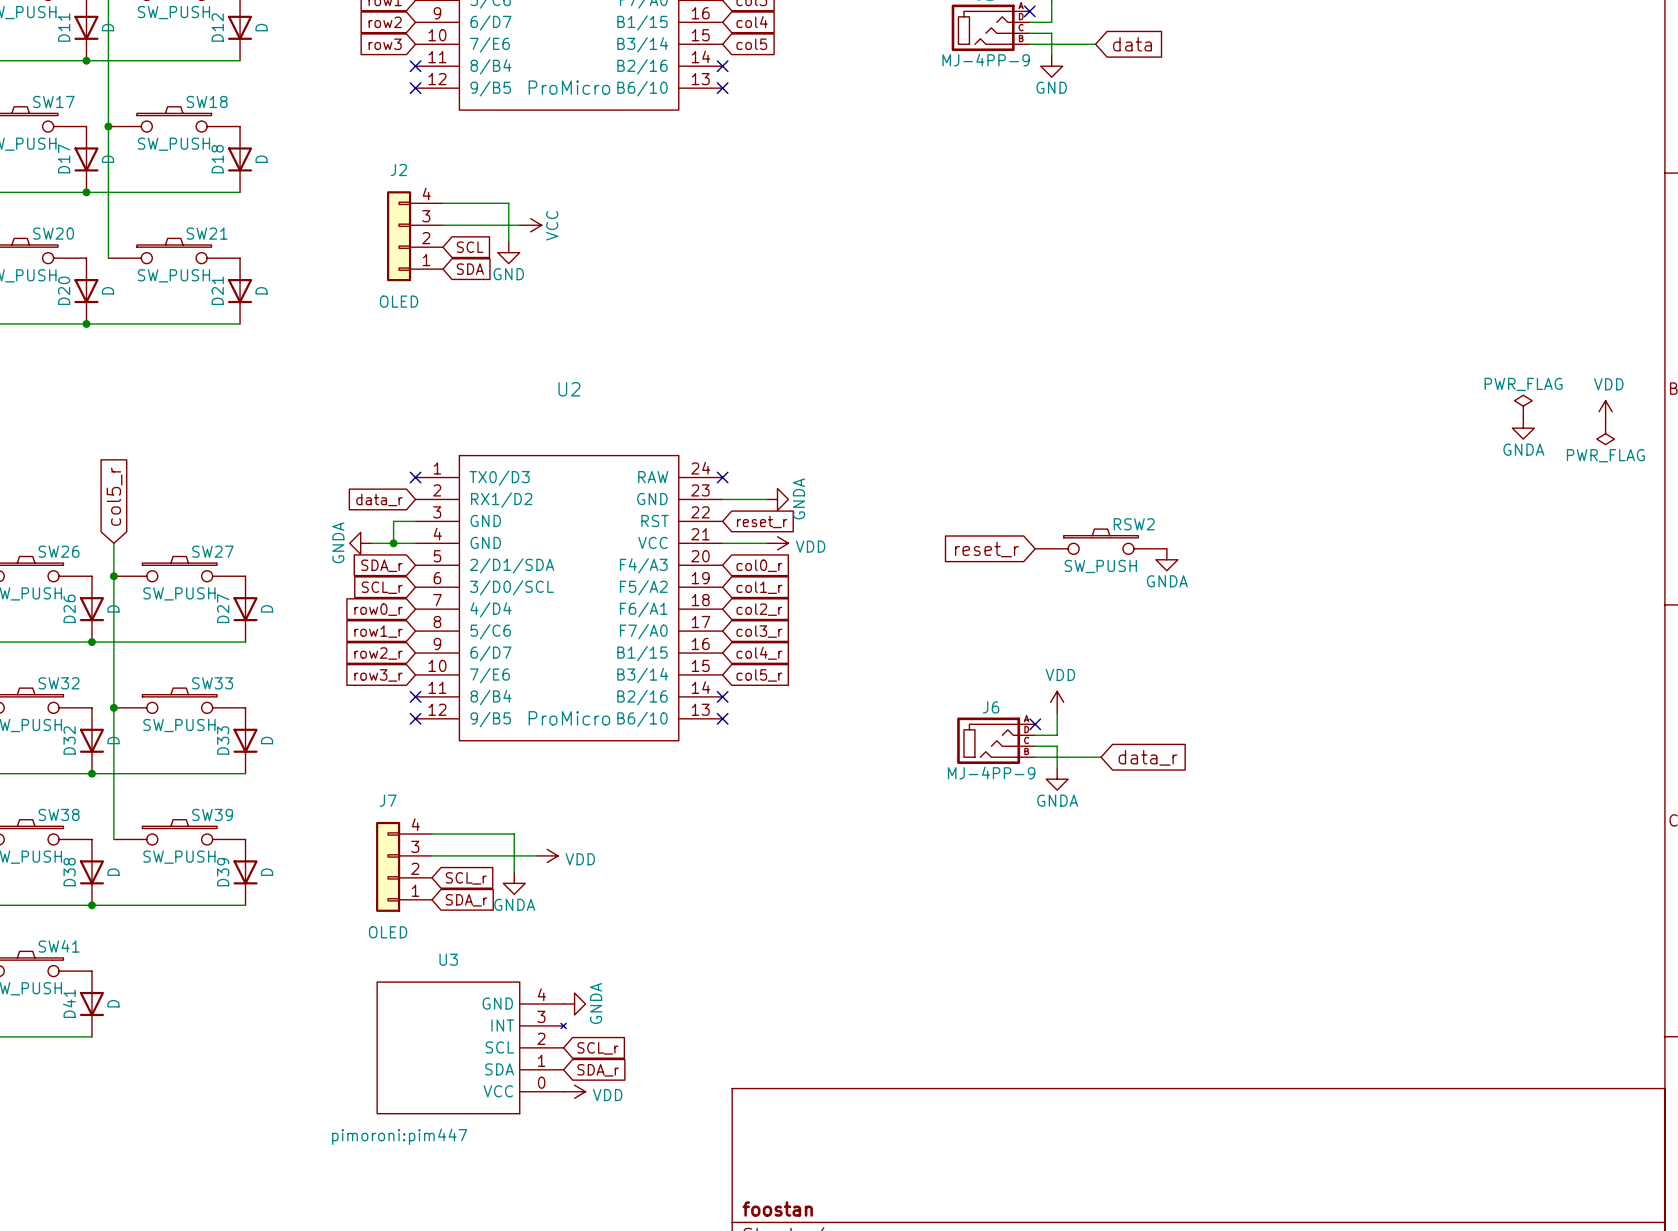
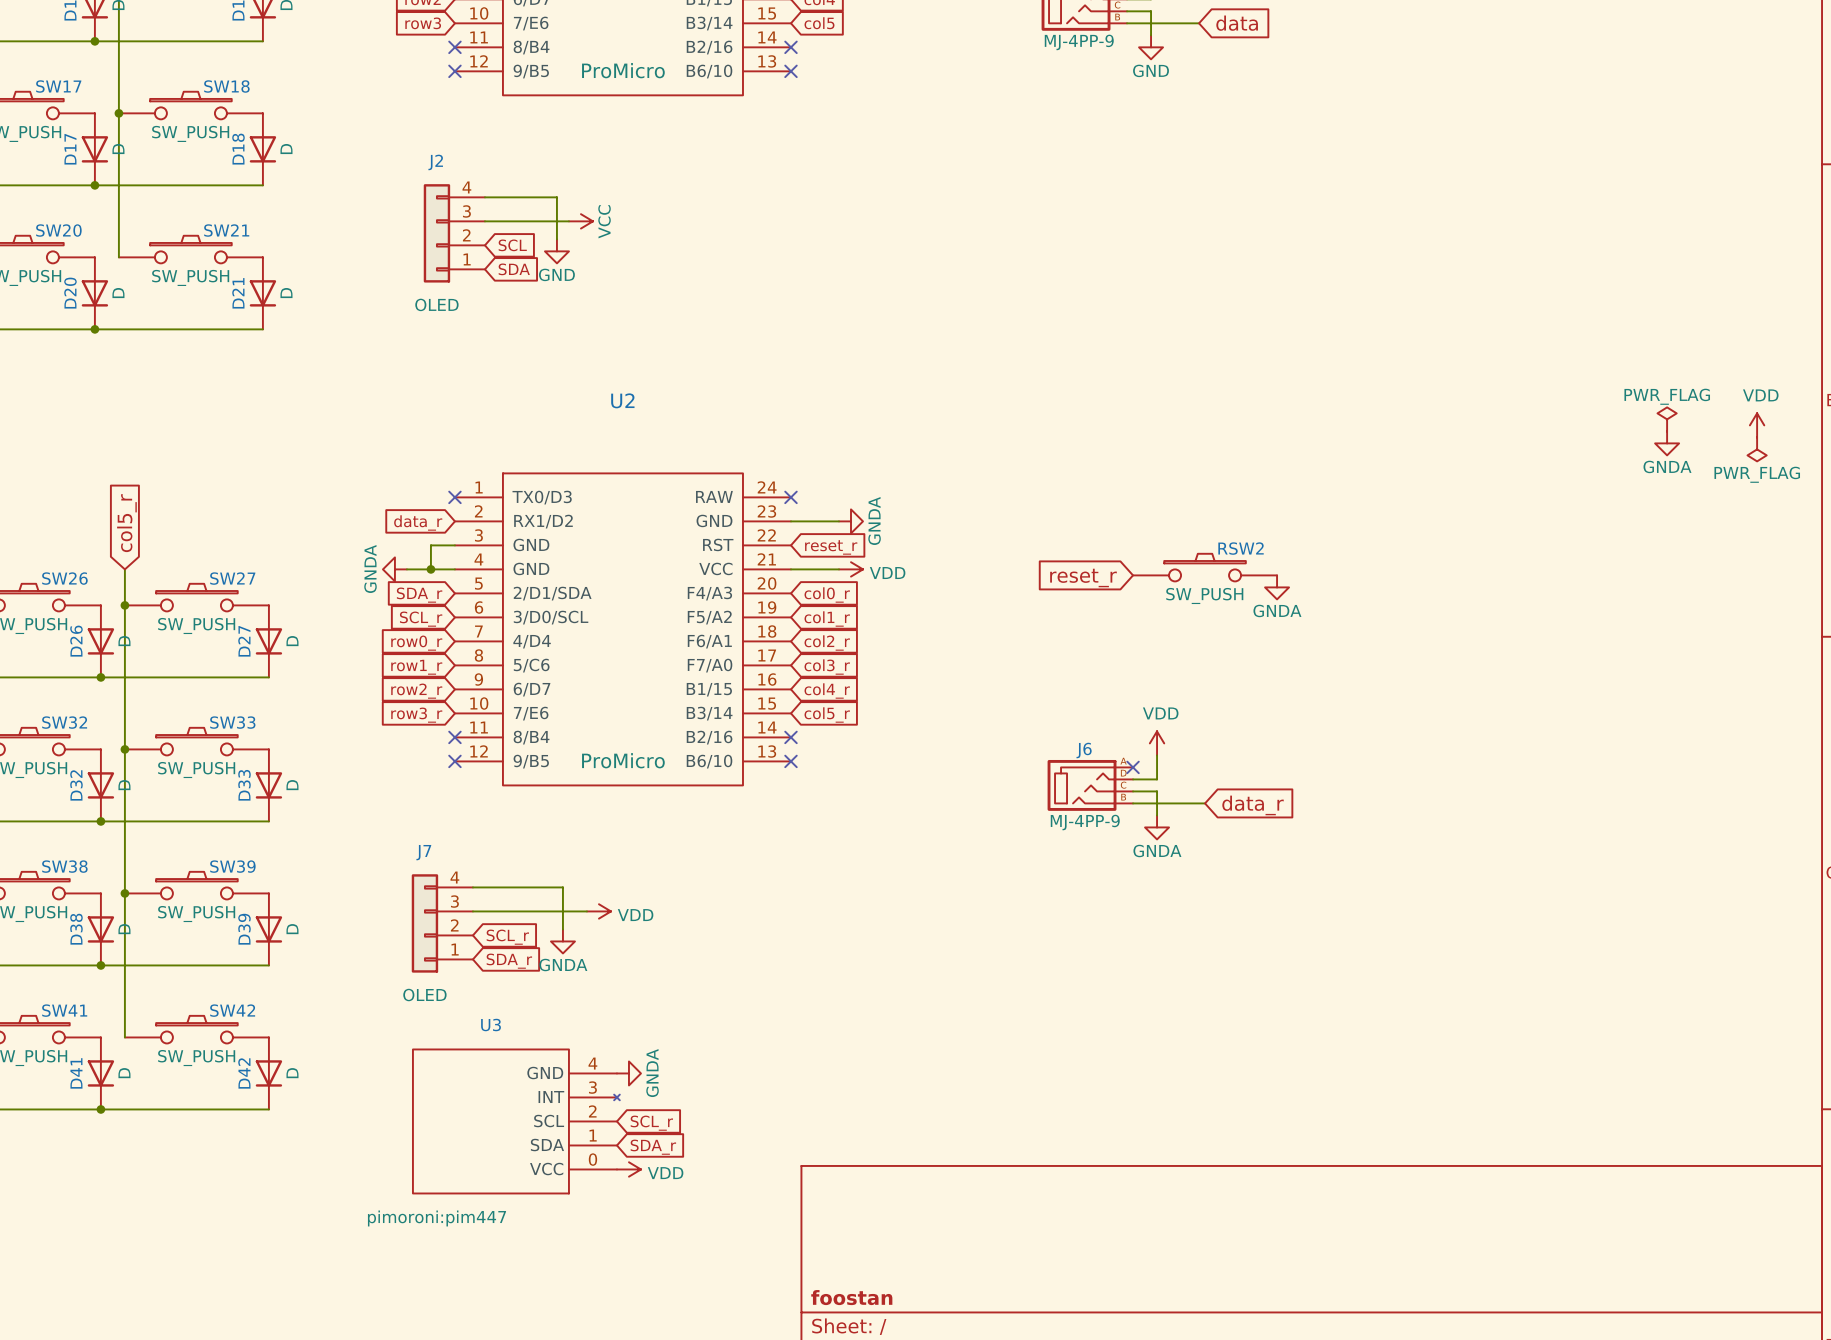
wire: none -> (124, 893) (124, 1037)
junction: none -> (124, 893)
SW42: none -> SW_PUSH (196, 1029)
D42: none -> D (268, 1073)
wire: none -> (100, 1109) (268, 1109)
junction: none -> (100, 1109)

